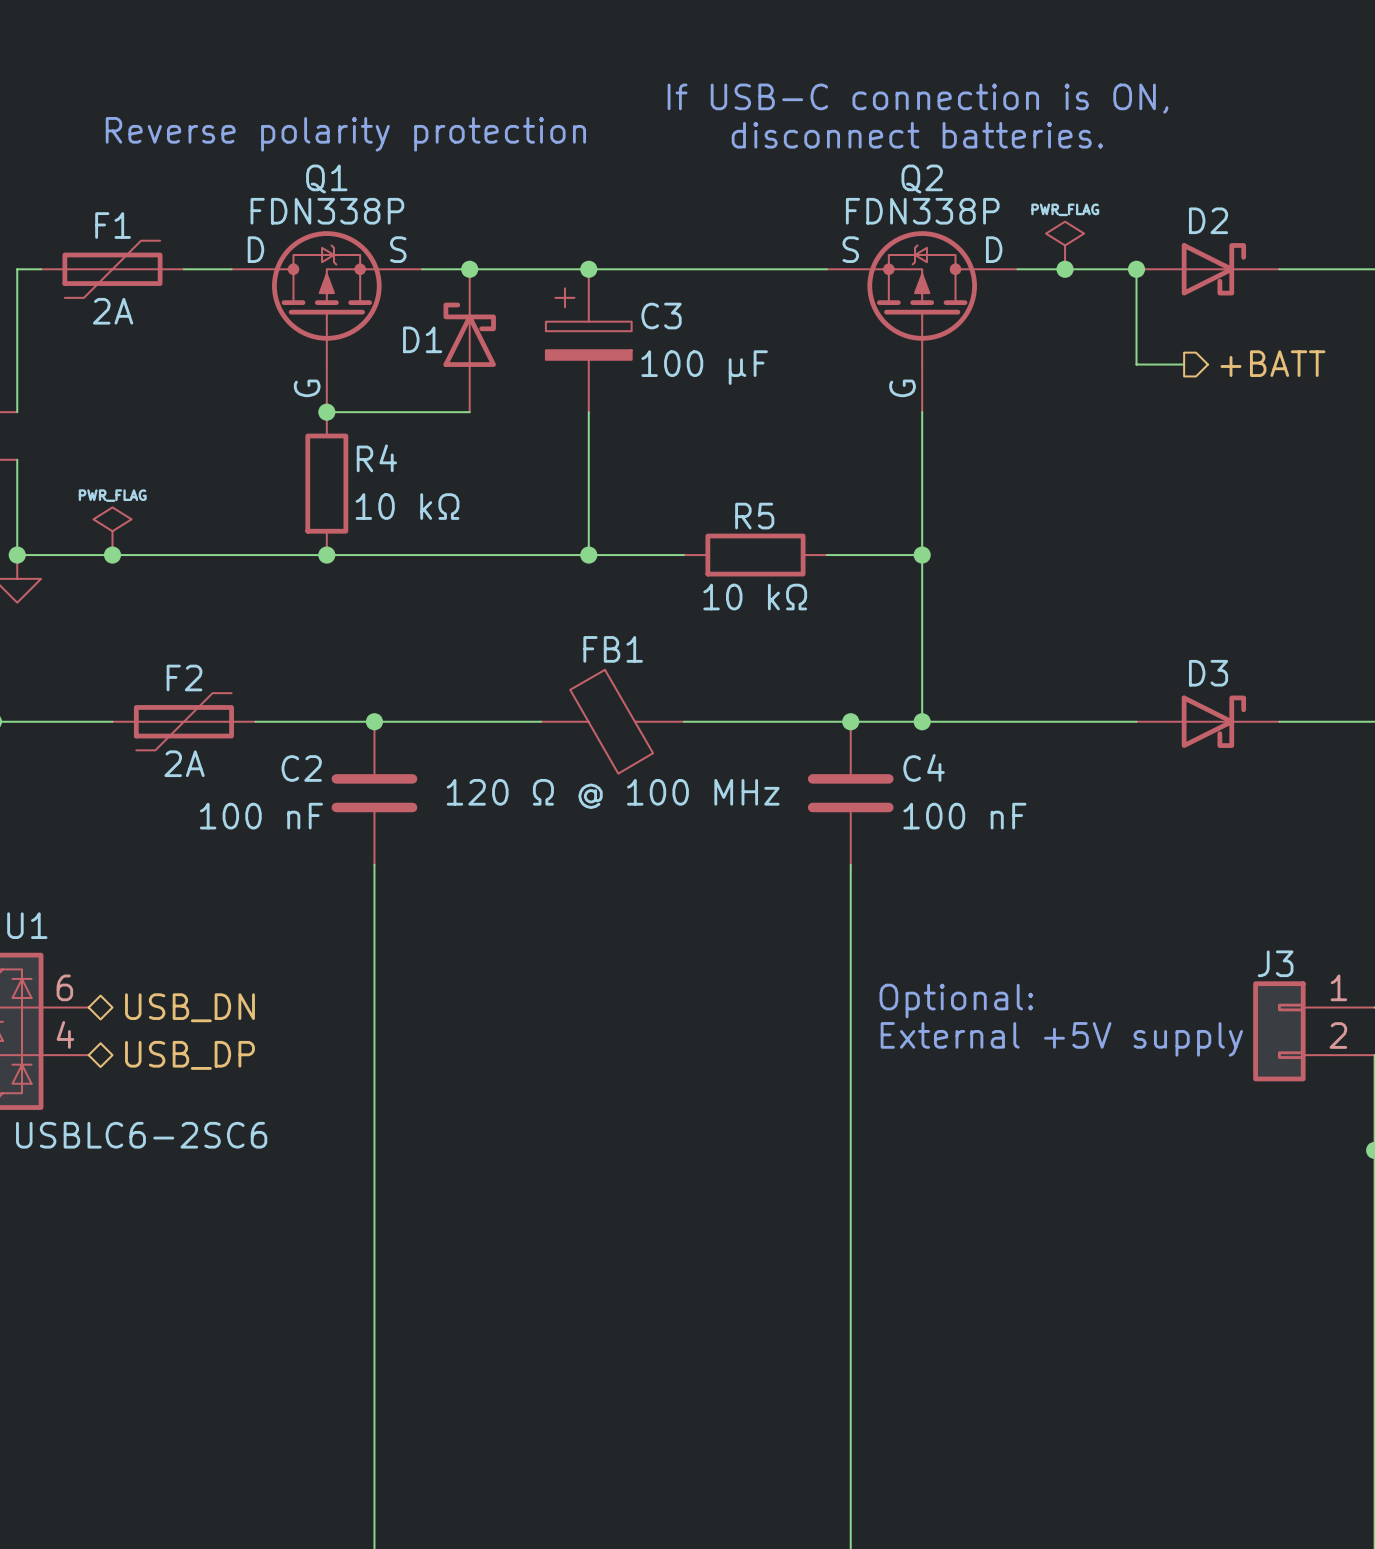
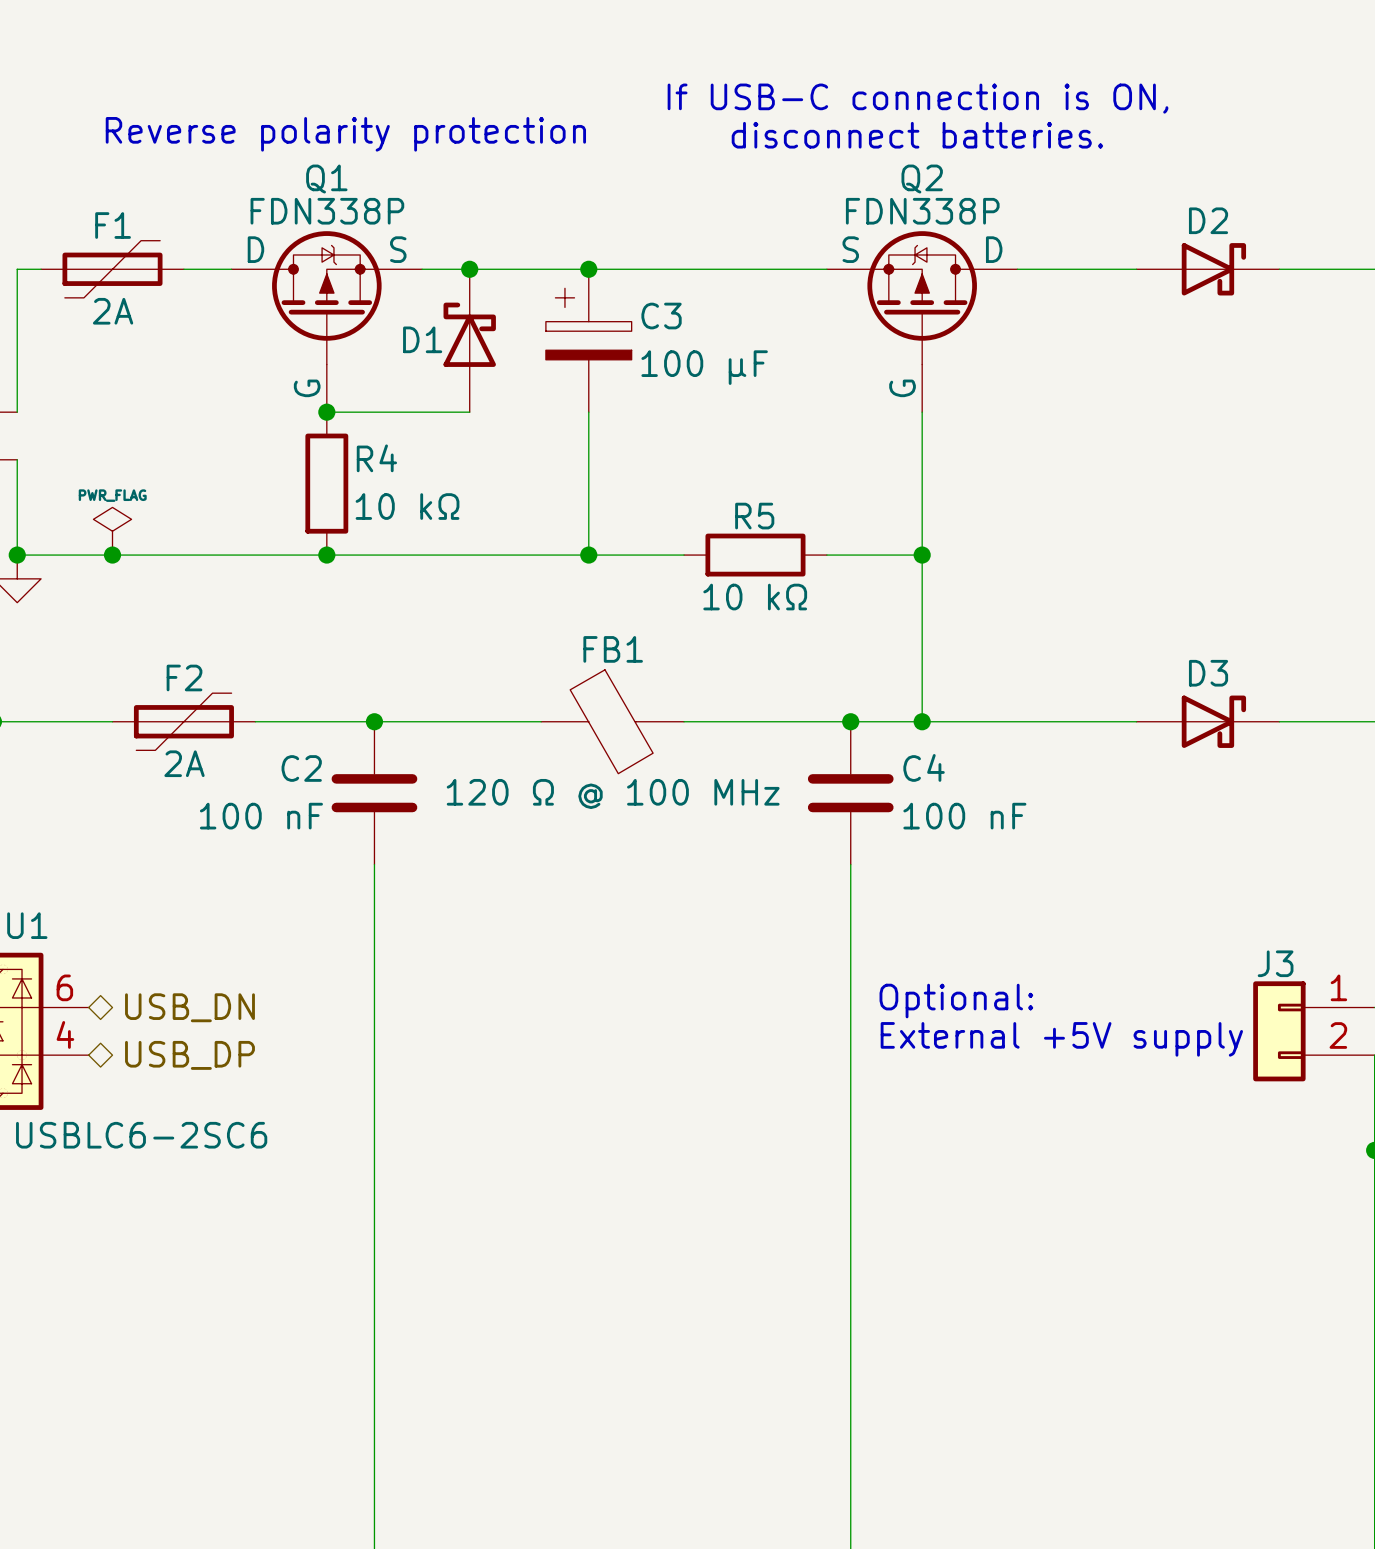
power symbol: PWR_FLAG (1065, 245) -> none
junction: (1065, 269) -> none
wire: (1136, 269) (1136, 364) (1184, 364) -> none
junction: (1136, 269) -> none
hierarchical label: +BATT (1272, 363) -> none

